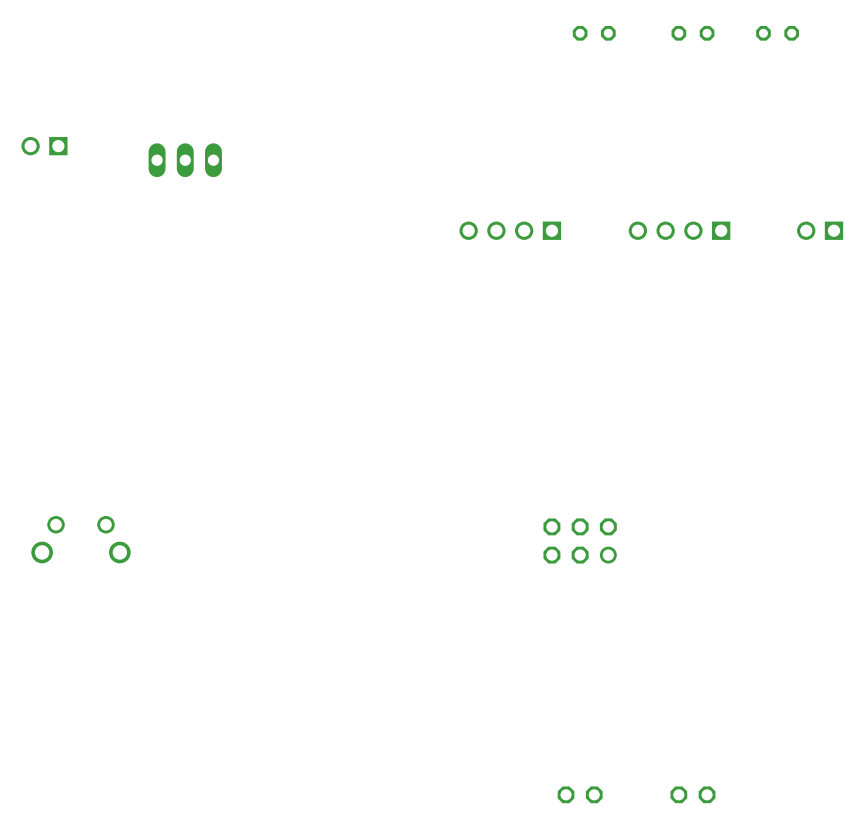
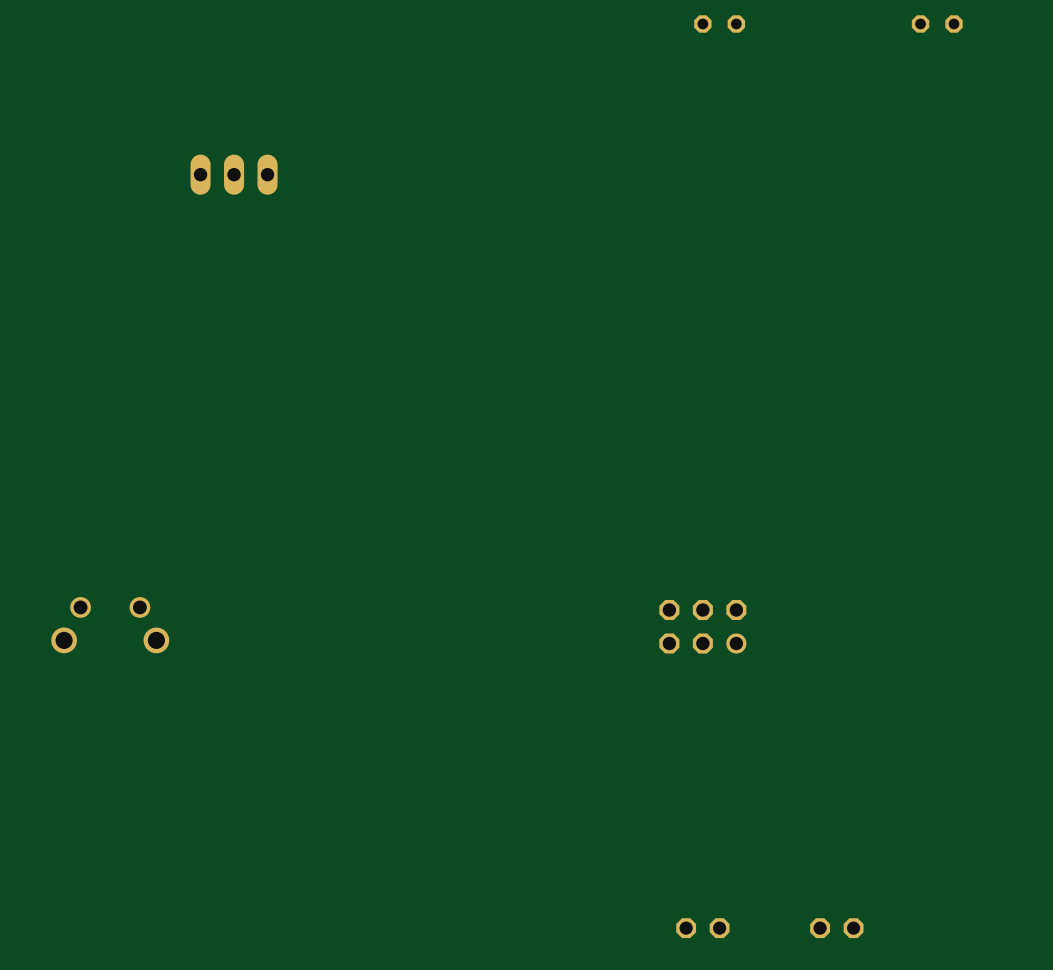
part: (692, 33) -> none
part: (44, 146) -> none
part: (510, 230) -> none
part: (679, 230) -> none
part: (820, 230) -> none

